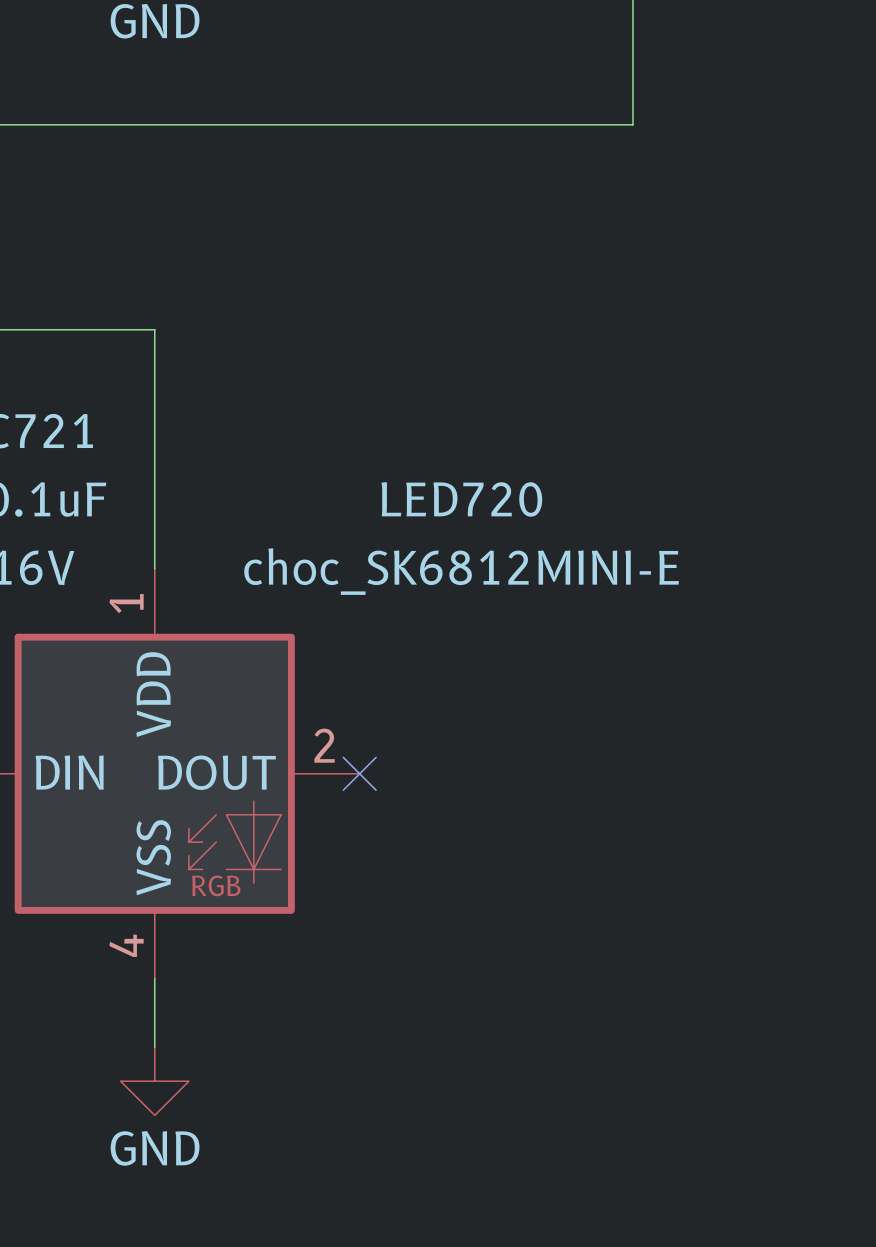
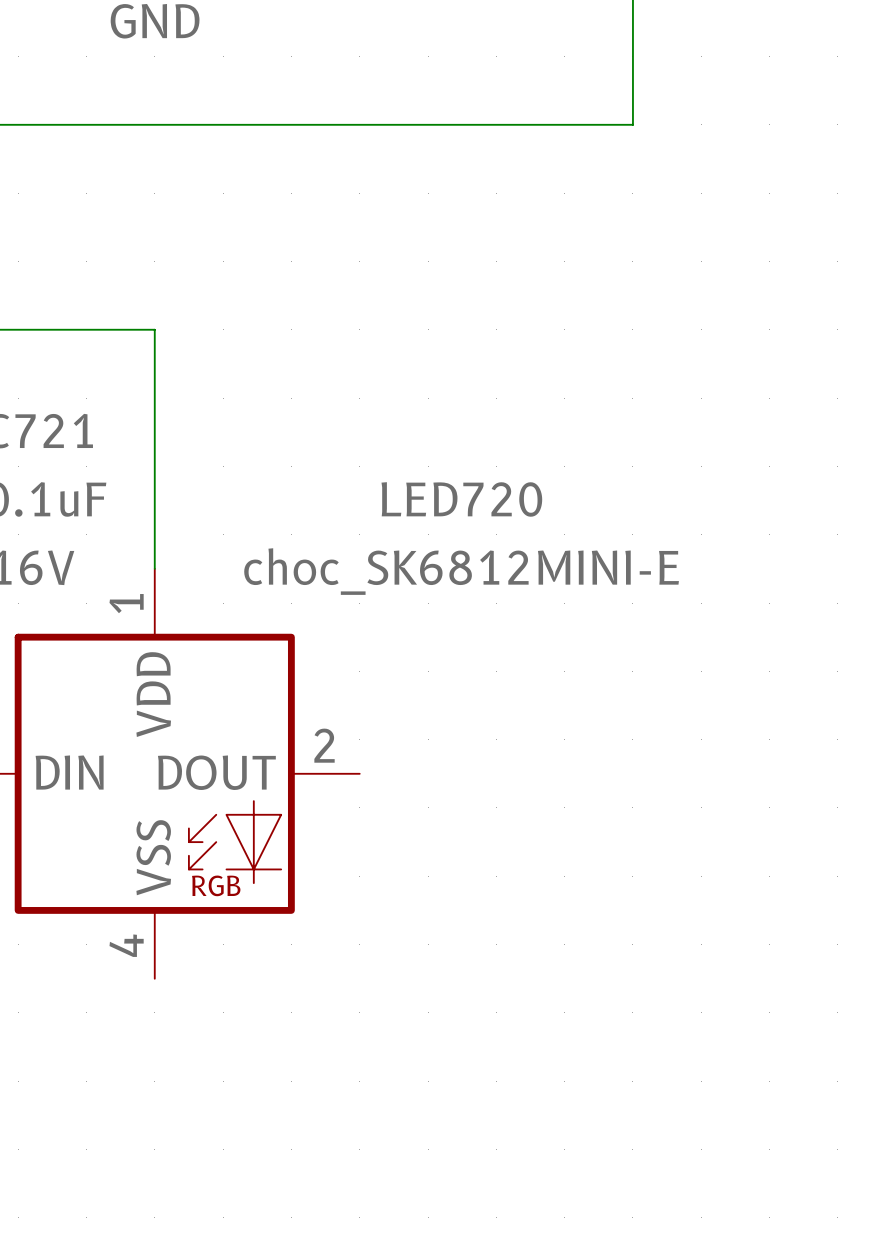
no-connect mark: (359, 773) -> none
wire: (154, 978) (154, 1047) -> none
power symbol: GND (154, 1081) -> none

